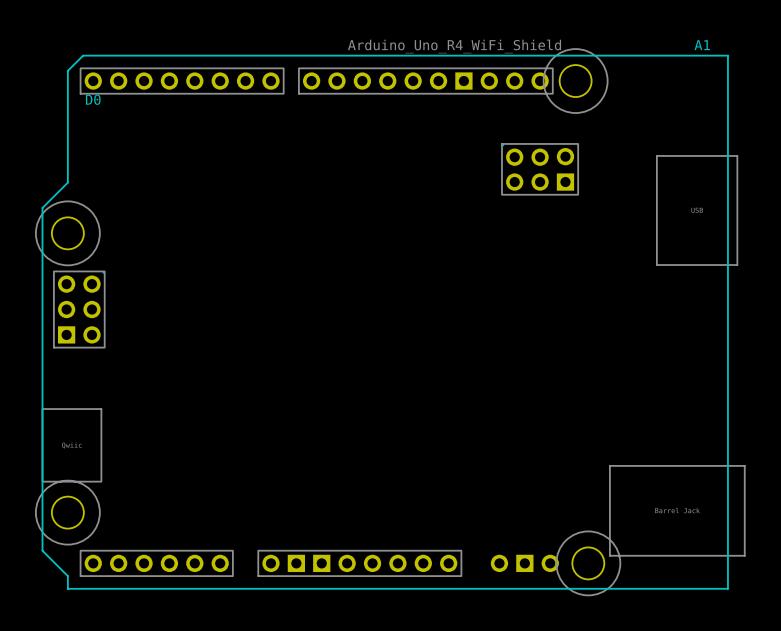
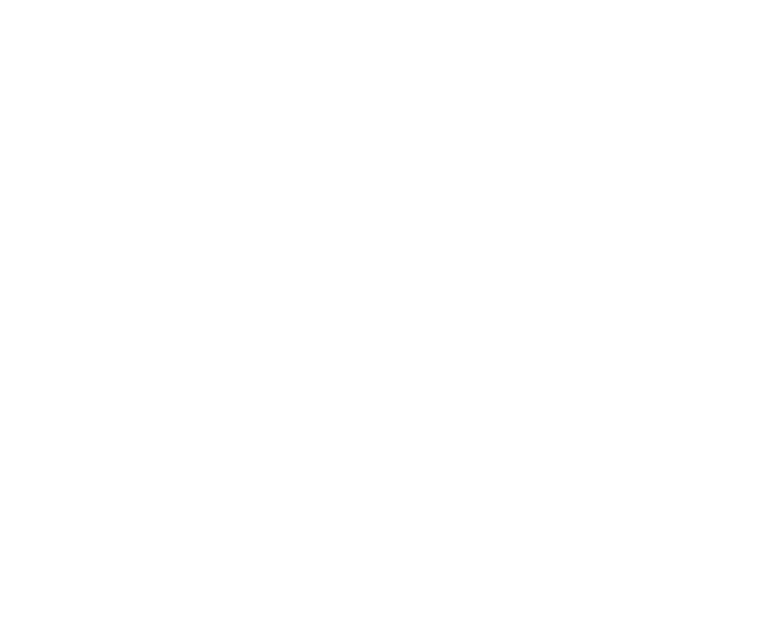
A1: Arduino_Uno_R4_WiFi_Shield (390, 322) -> none

